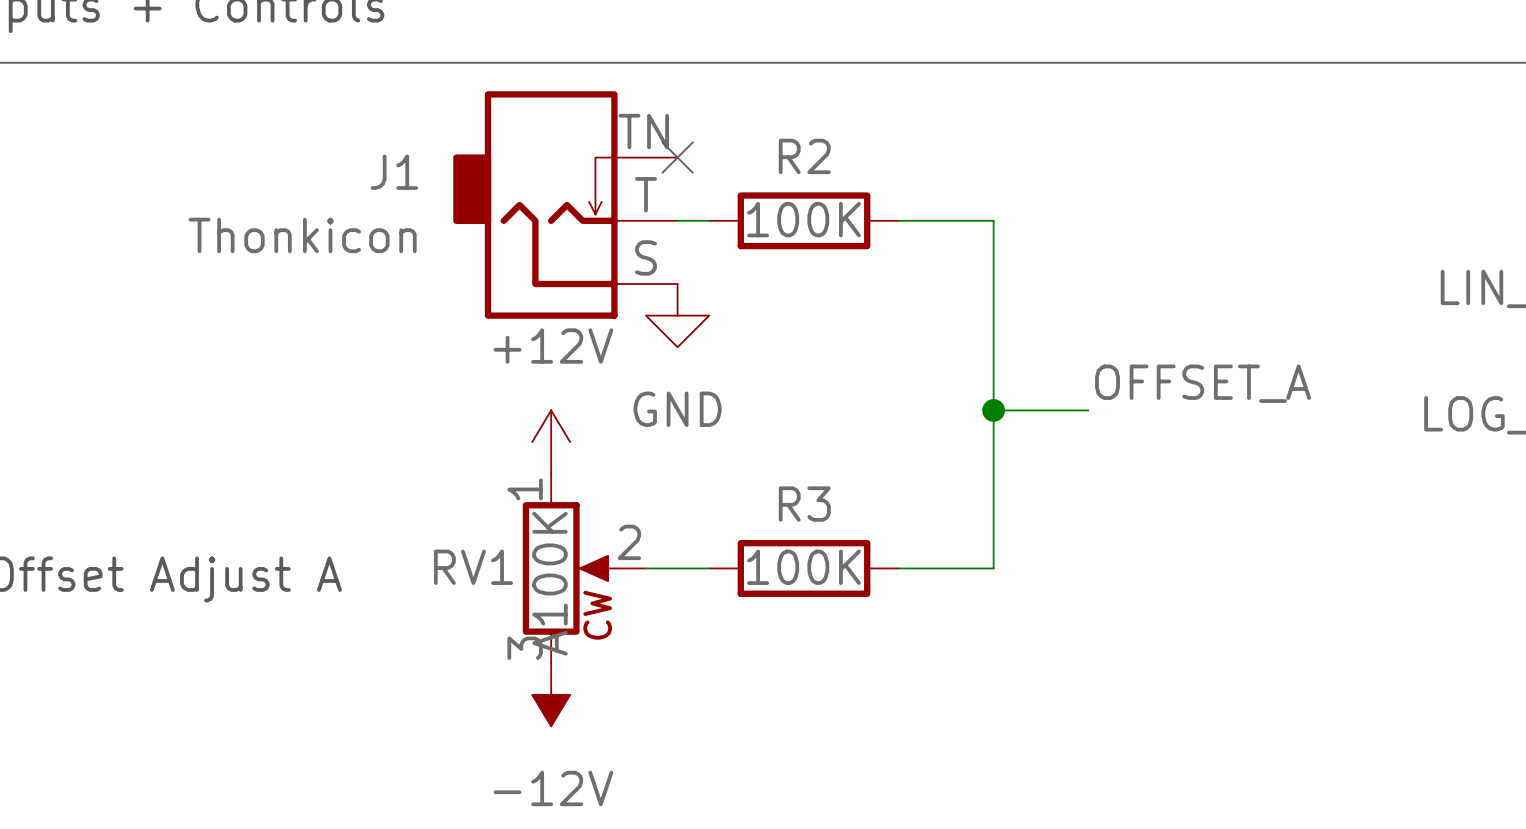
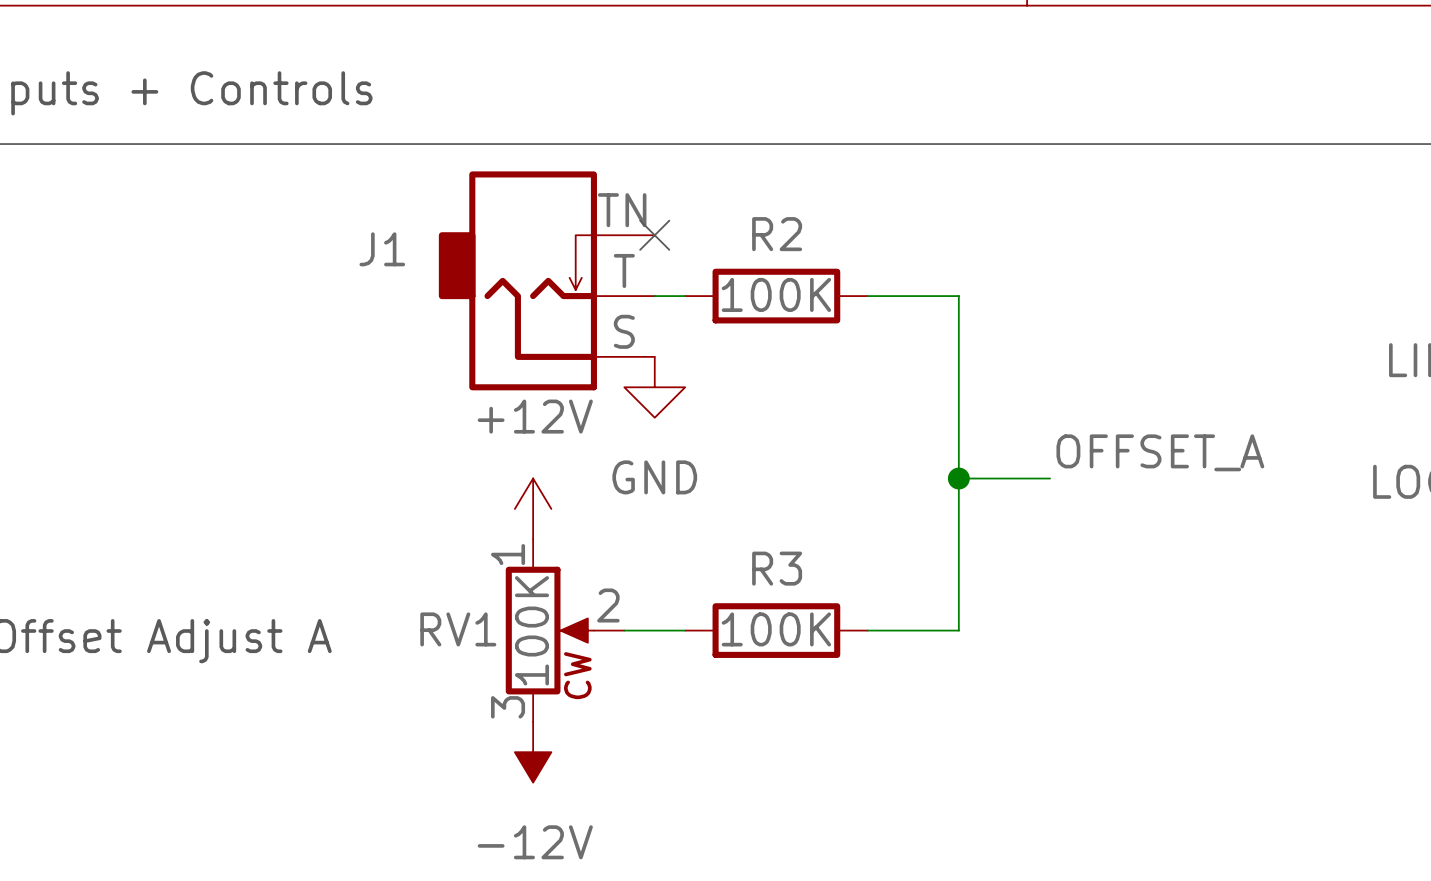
J1 value: Thonkicon (302, 235) -> none
RV1 value: A100K (550, 583) -> 100K (531, 630)

